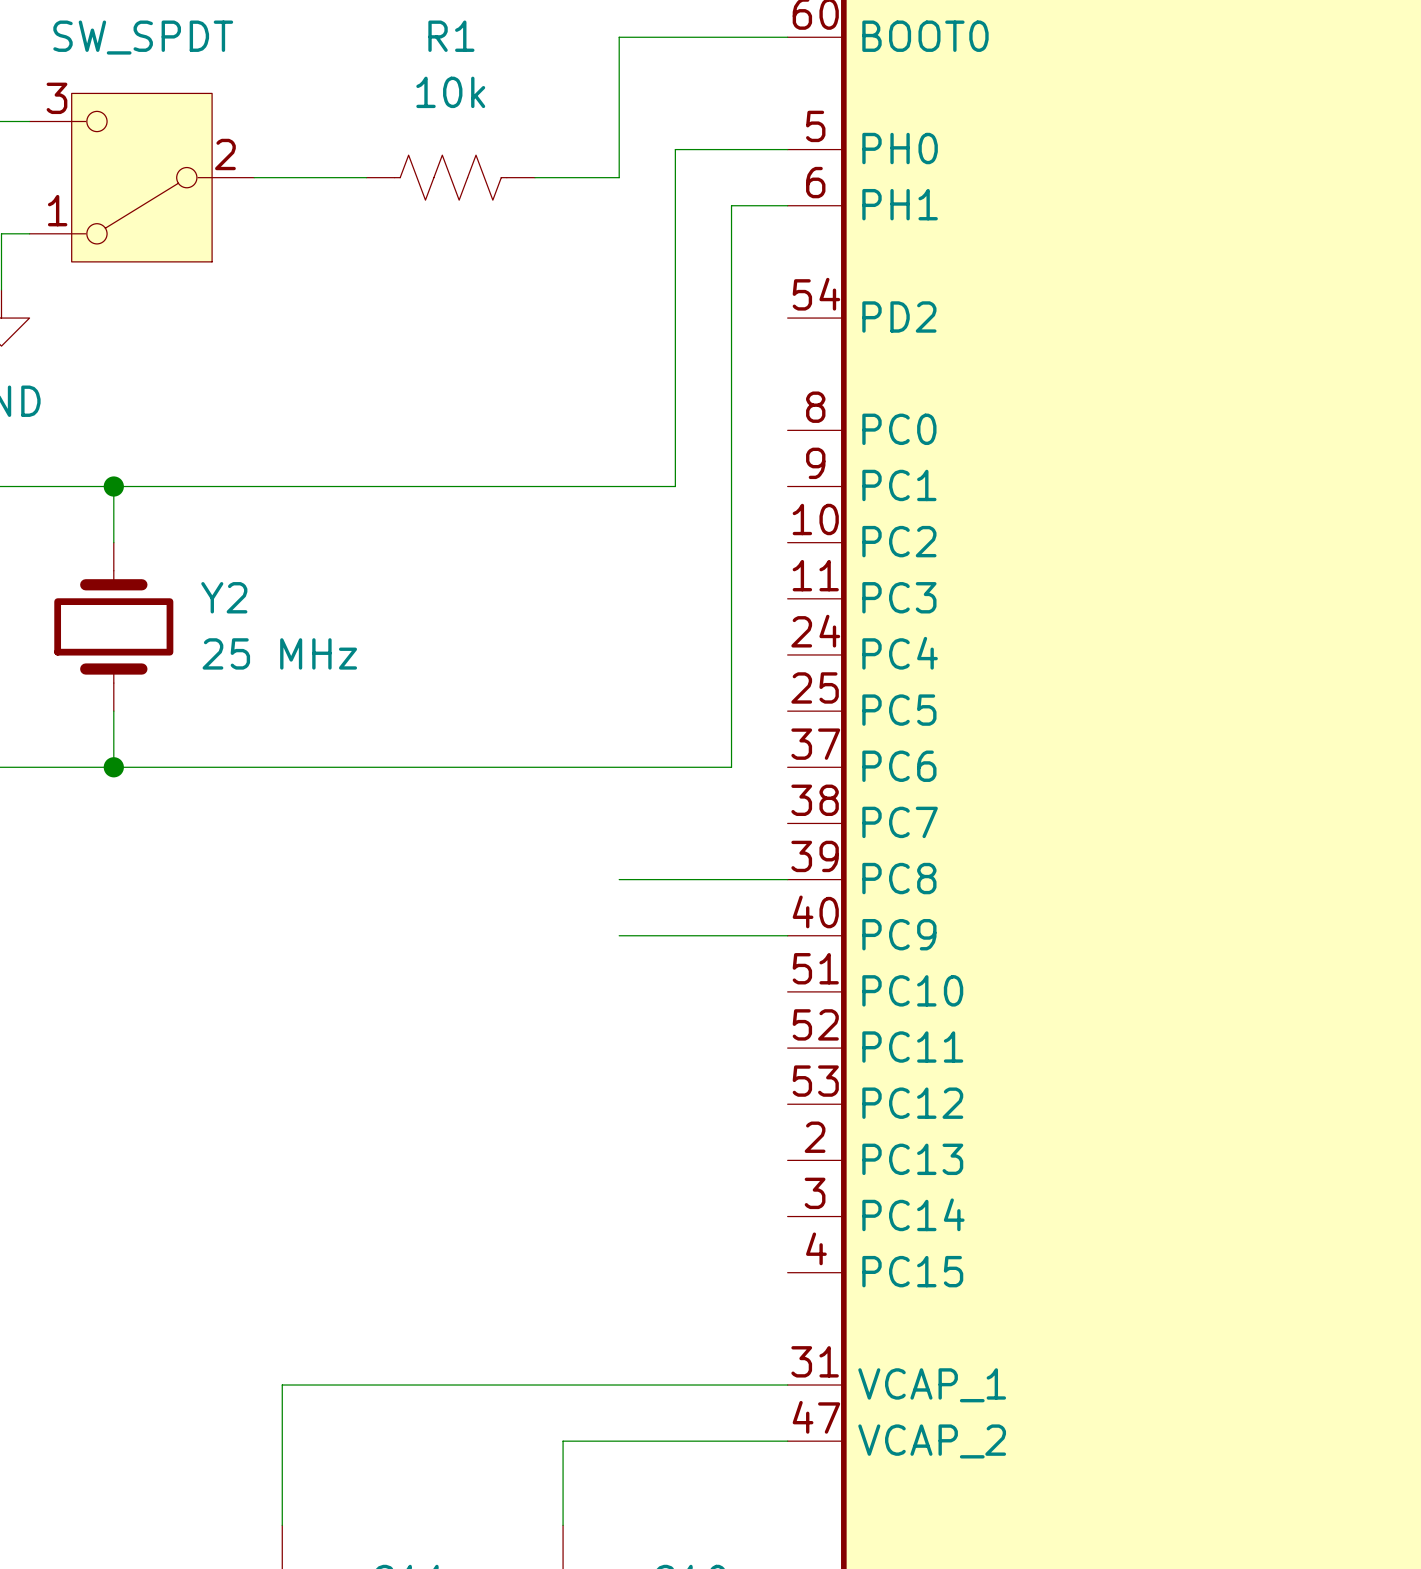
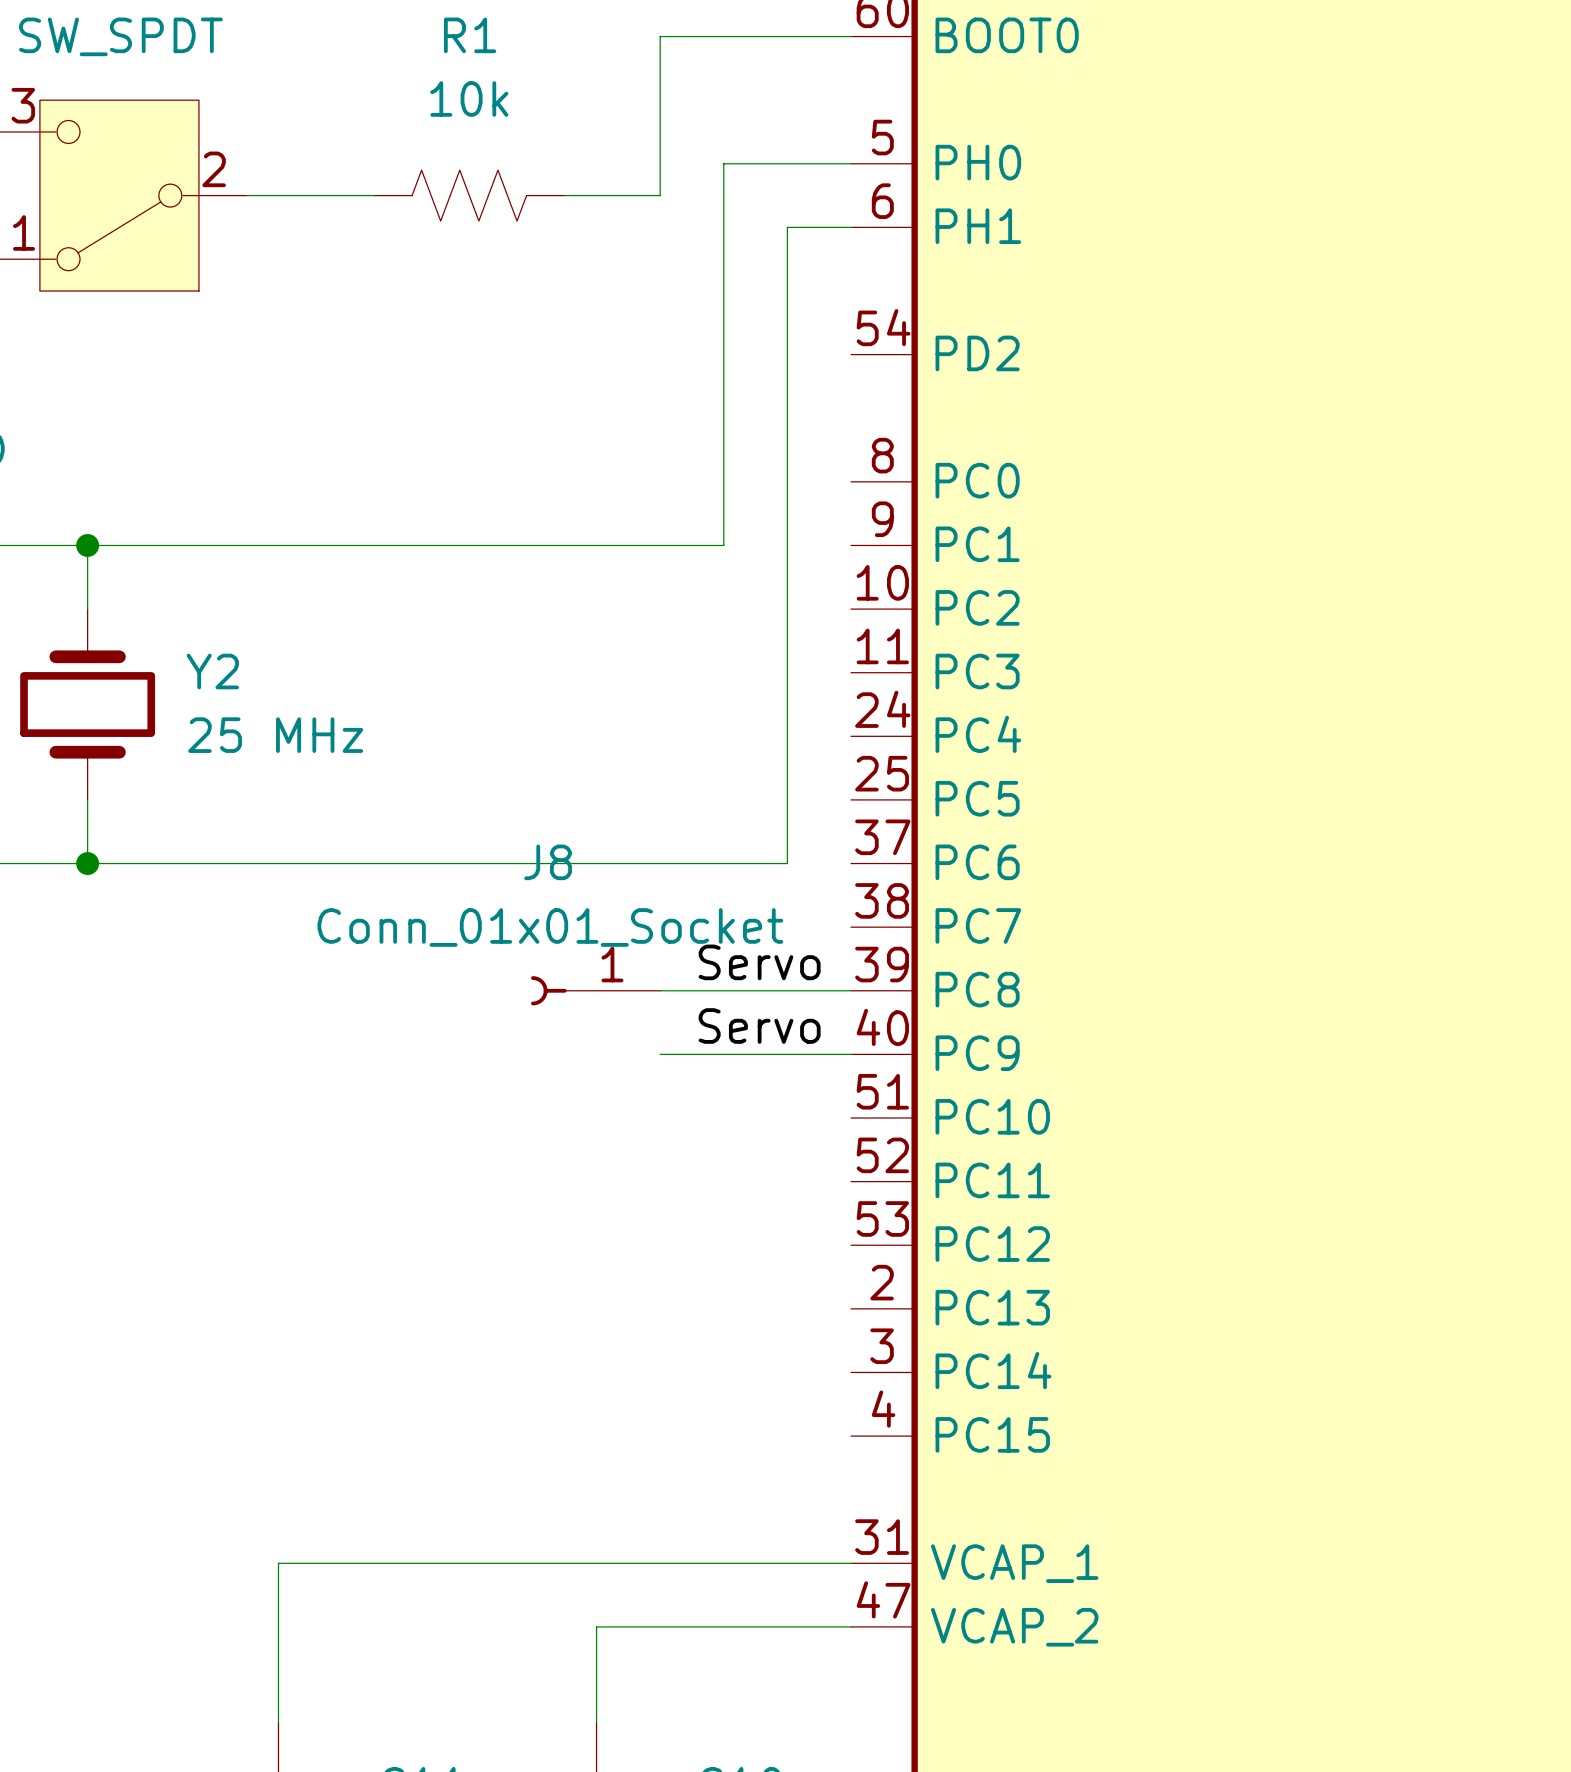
label: none -> Servo (759, 962)
J8: none -> Conn_01x01_Socket (595, 990)
label: none -> Servo (759, 1026)

